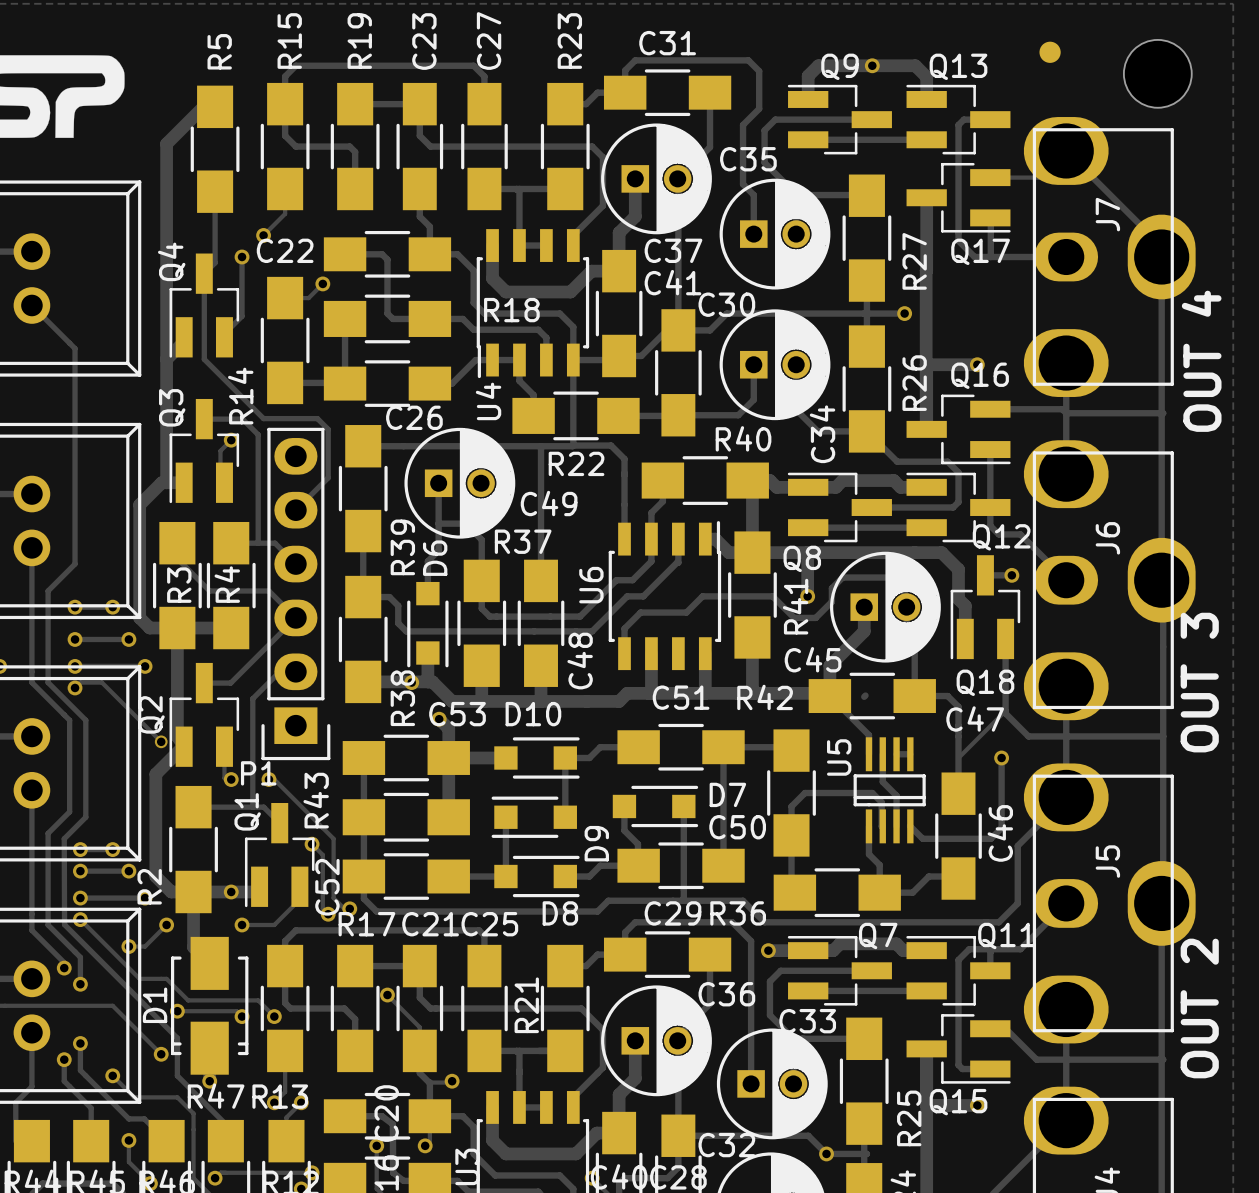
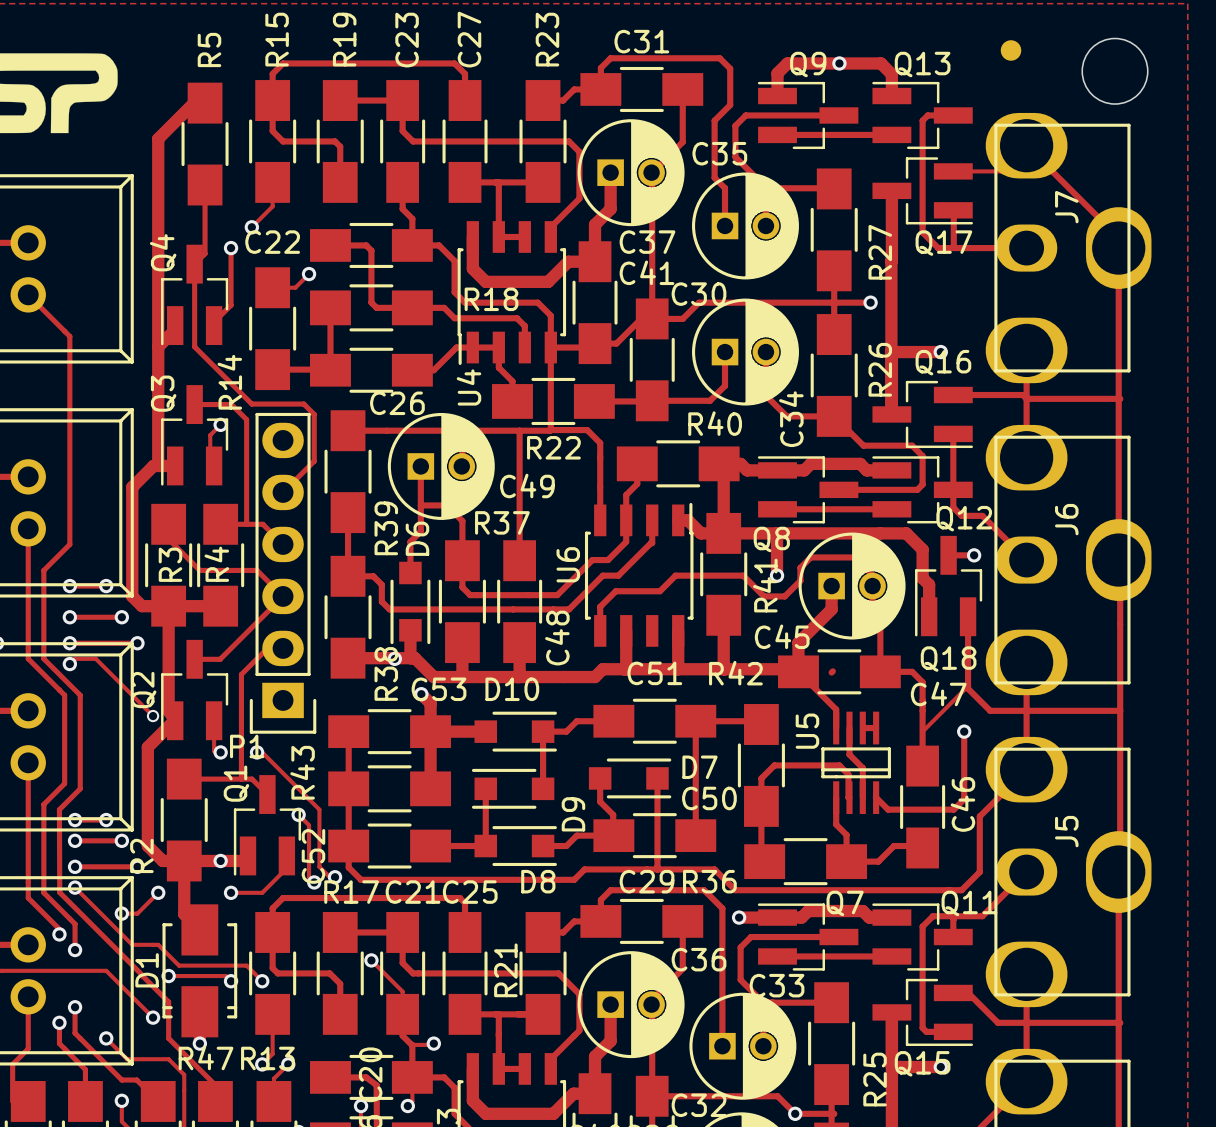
text: OUT 4 (1201, 361) -> none
text: OUT 3 (1199, 682) -> none
text: OUT 2 (1199, 1008) -> none

